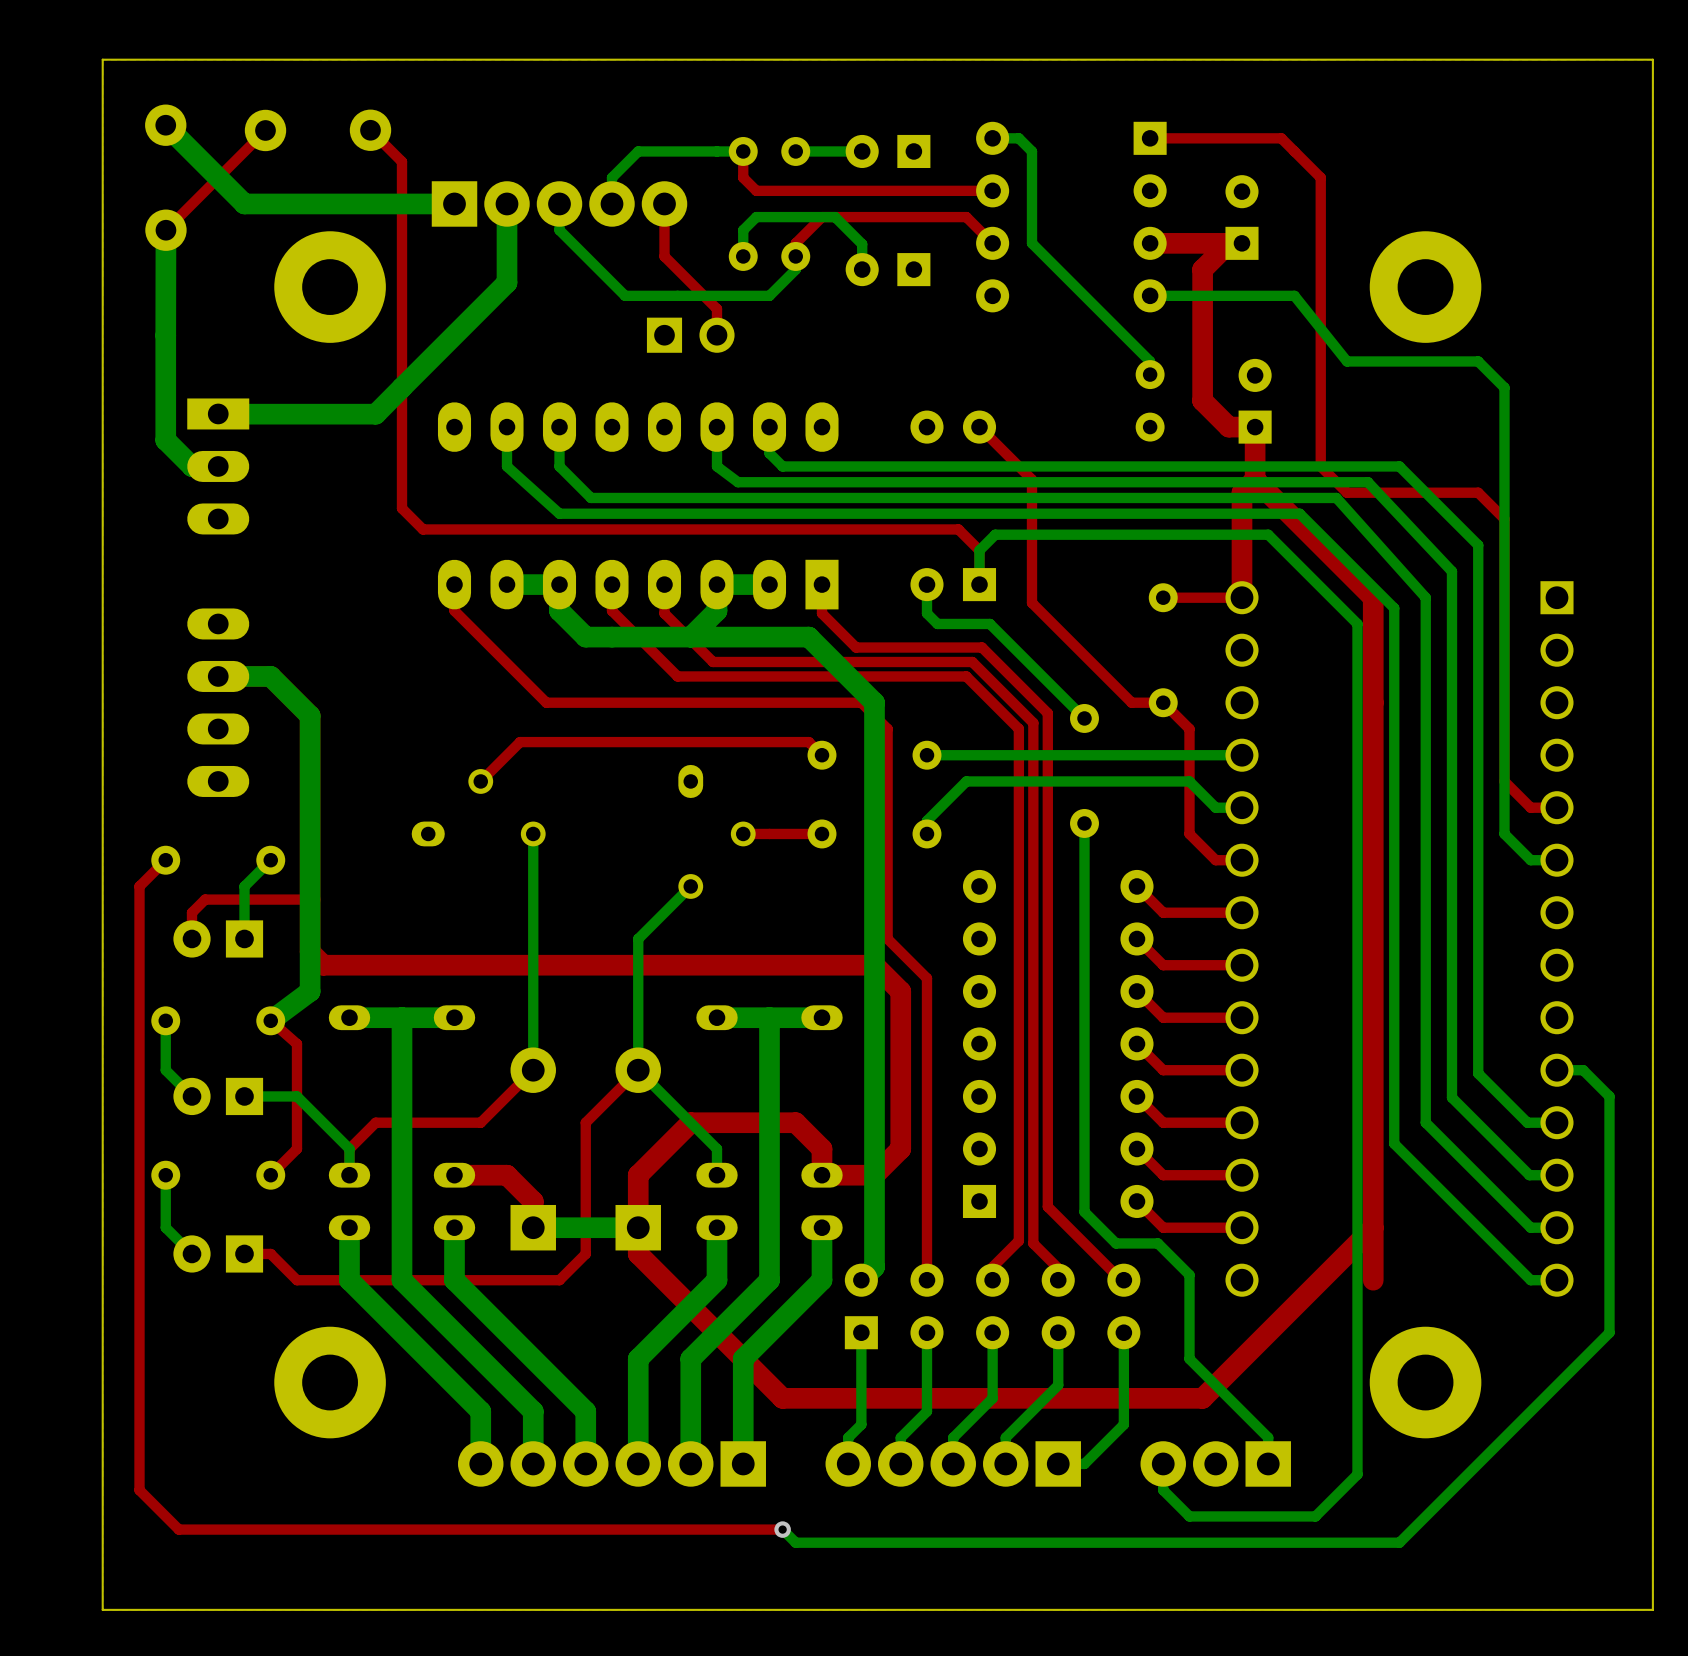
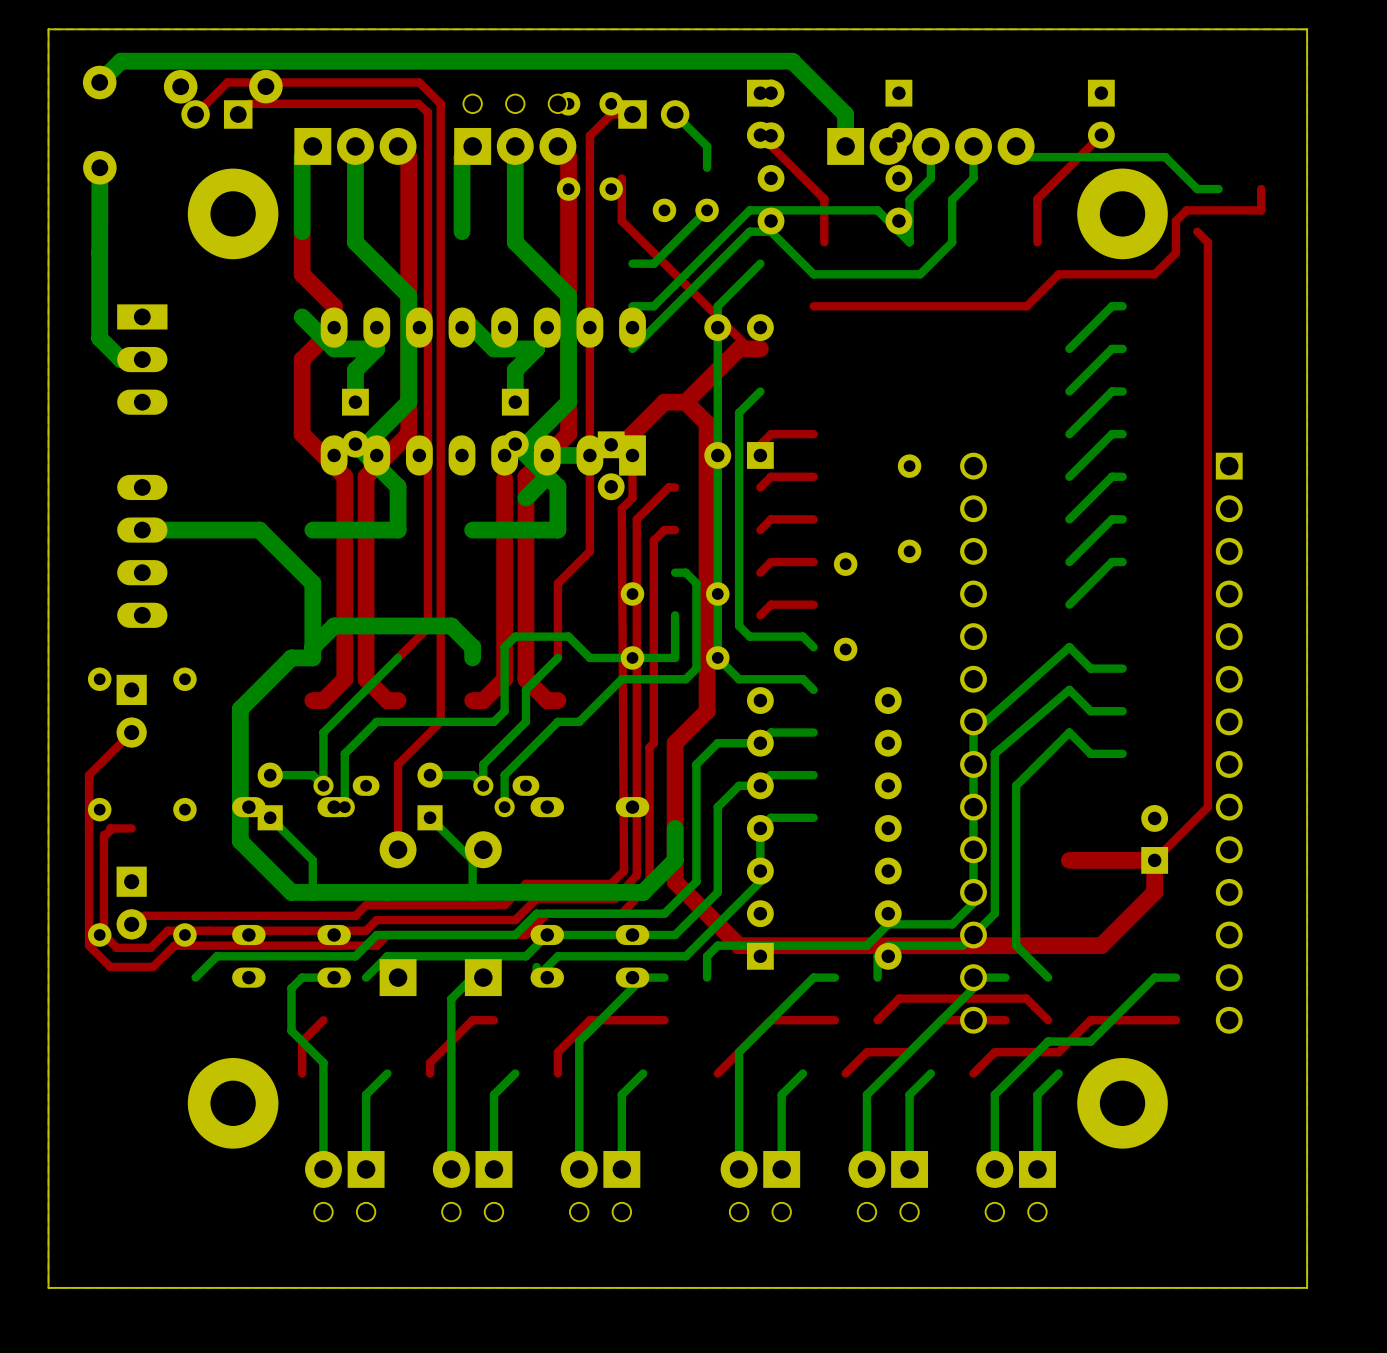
bottom track: (165, 125) (244, 203) (454, 203) -> (99, 82) (121, 61) (792, 61) (845, 114) (845, 146)
top track: (265, 130) (165, 230) -> none
top track: (370, 130) (402, 161) (402, 508) (423, 529) (958, 529) (979, 550) (979, 584) -> none
bottom track: (992, 138) (1018, 138) (1031, 151) (1031, 243) (1150, 361) (1150, 374) -> none
top track: (1150, 138) (1281, 138) (1320, 177) (1320, 268) -> (1101, 135) (1037, 199)
bottom track: (743, 151) (638, 151) (612, 177) (612, 203) -> none
top track: (743, 151) (743, 177) (756, 190) (992, 190) -> none
bottom track: (862, 151) (795, 151) -> none
part rotation: 0° (888, 151) -> 90° counterclockwise (760, 114)
part position: (888, 151) -> (760, 114)
top track: none -> (195, 114) (227, 82) (419, 82) (440, 103) (440, 721) (398, 764) (398, 860)
part: none -> (216, 114)
top track: none -> (238, 114) (248, 103) (418, 103) (427, 112) (427, 628) (398, 657)
top track: none -> (632, 114) (611, 114) (589, 135) (589, 551) (557, 583) (557, 657)
part: none -> (653, 114)
bottom track: none -> (675, 114) (707, 146) (707, 167)
part: none -> (1101, 114)
part: none -> (515, 129)
top track: none -> (760, 135) (824, 199) (824, 242)
bottom track: none -> (312, 146) (302, 157) (302, 231)
bottom track: none -> (355, 146) (355, 242) (408, 295) (408, 402) (366, 444) (355, 444) (398, 486) (398, 530) (312, 530)
part: none -> (355, 146)
bottom track: (507, 203) (507, 282) (375, 414) (218, 414) -> none
top track: none -> (398, 146) (408, 157) (408, 434) (366, 476) (366, 679) (387, 700) (398, 700)
bottom track: (559, 203) (559, 230) (625, 295) (769, 295) (795, 269) (795, 256) -> none
part: (559, 203) -> none
bottom track: none -> (472, 146) (462, 157) (462, 231)
top track: (664, 203) (664, 256) (717, 308) (717, 335) -> none
bottom track: none -> (515, 146) (515, 242) (568, 295) (568, 402) (526, 444) (515, 444) (557, 486) (557, 530) (472, 530)
top track: none -> (557, 146) (568, 157) (568, 434) (525, 476) (525, 679) (547, 700) (557, 700)
bottom track: none -> (930, 146) (930, 178) (909, 199) (909, 242) (877, 210) (749, 210) (653, 306) (632, 306)
part: none -> (930, 146)
bottom track: none -> (973, 146) (973, 178) (952, 199) (952, 242) (920, 274) (813, 274) (771, 231) (749, 231) (632, 348)
bottom track: none -> (1016, 146) (1026, 157) (1165, 157) (1197, 189) (1218, 189)
part: (1241, 217) -> none
top track: none -> (621, 178) (621, 221) (749, 348) (760, 348) (739, 348) (685, 402)
top track: (992, 243) (966, 217) (822, 217) (795, 243) (795, 256) -> none
top track: (1228, 243) (1202, 269) (1202, 400) (1228, 427) (1255, 427) (1255, 479) -> none
top track: (1241, 243) (1150, 243) -> none
part footprint: [845, 253, 931, 287] -> [652, 198, 719, 223]
bottom track: (743, 256) (743, 230) (756, 217) (835, 217) (862, 244) (862, 269) -> none
top track: none -> (1261, 189) (1261, 210) (1186, 210) (1175, 221) (1175, 253) (1154, 274) (1058, 274) (1026, 306) (813, 306)
bottom track: none -> (707, 210) (653, 263) (632, 263)
bottom track: (1150, 295) (1294, 295) (1346, 361) (1478, 361) (1504, 387) (1504, 833) (1530, 860) (1556, 860) -> none
top track: none -> (302, 231) (302, 274) (334, 306) (334, 327) (302, 359) (302, 434) (344, 476) (344, 679) (323, 700) (312, 700)
top track: none -> (1197, 231) (1207, 242) (1207, 807) (1154, 860)
top track: (1320, 322) (1320, 466) (1346, 492) (1478, 492) (1504, 518) (1504, 781) (1530, 807) (1556, 807) -> none
part: (690, 335) -> none
bottom track: none -> (760, 263) (717, 306) (717, 455)
part: (1150, 400) -> none
bottom track: none -> (1122, 306) (1112, 306) (1069, 348)
part: (1255, 401) -> none
bottom track: none -> (302, 316) (334, 348) (376, 348) (355, 370) (355, 402)
bottom track: none -> (462, 316) (493, 348) (536, 348) (515, 370) (515, 402)
bottom track: (559, 427) (559, 466) (591, 497) (1336, 497) (1425, 597) (1425, 1122) (1530, 1227) (1556, 1227) -> none
bottom track: (769, 427) (769, 453) (782, 466) (1399, 466) (1478, 545) (1478, 1073) (1527, 1122) (1556, 1122) -> none
top track: (979, 427) (1031, 479) (1031, 602) (1131, 702) (1163, 702) (1189, 728) (1189, 833) (1215, 860) (1241, 860) -> none
bottom track: (507, 440) (507, 466) (559, 513) (1299, 513) (1394, 608) (1394, 1143) (1530, 1280) (1556, 1280) -> none
bottom track: (717, 440) (717, 466) (738, 482) (1367, 482) (1451, 571) (1451, 1097) (1529, 1175) (1556, 1175) -> none
bottom track: none -> (1122, 348) (1112, 348) (1069, 391)
top track: (1255, 479) (1241, 492) (1241, 597) (1163, 597) -> none
top track: (1255, 479) (1373, 597) (1373, 1280) -> none
bottom track: none -> (760, 391) (739, 412) (739, 625) (749, 636) (803, 636) (813, 647)
bottom track: none -> (1122, 391) (1112, 391) (1069, 434)
top track: none -> (685, 402) (664, 402) (621, 444) (611, 444)
top track: none -> (685, 402) (707, 423) (707, 711) (675, 743) (675, 881) (739, 945) (1101, 945) (1154, 892) (1154, 860)
part: none -> (355, 423)
part: none -> (515, 423)
top track: none -> (813, 434) (771, 434) (760, 444)
bottom track: none -> (1122, 434) (1112, 434) (1069, 476)
top track: (454, 584) (454, 610) (546, 702) (861, 702) (887, 728) (887, 938) (927, 978) (927, 1280) -> none
bottom track: (507, 584) (559, 584) (559, 610) (585, 637) (808, 637) (874, 702) (874, 781) -> none
top track: (612, 584) (612, 610) (677, 676) (861, 676) -> (131, 732) (89, 775) (89, 945) (110, 966) (152, 966) (174, 945) (376, 945) (387, 934) (525, 934) (547, 913) (621, 913) (649, 883) (649, 747) (653, 743) (653, 540) (664, 530)
bottom track: (979, 584) (979, 550) (995, 534) (1268, 534) (1357, 623) (1357, 1474) (1315, 1516) (1189, 1516) (1163, 1490) (1163, 1463) -> (930, 1073) (909, 1094) (909, 1169)
part: none -> (611, 465)
top track: none -> (813, 476) (771, 476) (760, 487)
bottom track: none -> (1122, 476) (1112, 476) (1069, 519)
top track: (664, 613) (713, 662) (972, 662) (1033, 722) (1033, 1243) (1058, 1268) (1058, 1280) -> (504, 478) (504, 679) (483, 700) (472, 700)
top track: (822, 613) (856, 647) (982, 647) (1047, 713) (1047, 1206) (1121, 1280) (1123, 1280) -> (1048, 1020) (1026, 998) (899, 998) (877, 1020)
top track: none -> (632, 478) (632, 498) (621, 508) (623, 871) (611, 883) (525, 883) (504, 905) (366, 905) (355, 915) (144, 915) (135, 924) (131, 924)
bottom track: (927, 613) (937, 623) (989, 623) (1084, 718) -> (717, 478) (717, 647)
top track: none -> (675, 487) (668, 487) (636, 519) (636, 875) (615, 898) (536, 898) (515, 920) (376, 920) (366, 930) (167, 930) (150, 947) (116, 947) (103, 934) (103, 834)
top track: none -> (813, 519) (771, 519) (760, 530)
bottom track: none -> (1122, 519) (1112, 519) (1069, 562)
top track: (218, 676) (270, 676) (310, 715) (310, 952) (323, 965) (874, 965) (900, 991) (900, 1148) (874, 1175) (822, 1175) (822, 1148) (795, 1122) (690, 1122) (638, 1175) (638, 1253) (782, 1398) (1202, 1398) (1373, 1227) -> none
bottom track: (270, 676) (310, 715) (310, 991) (270, 1020) -> (184, 530) (259, 530) (312, 583) (312, 657) (291, 657) (240, 709) (240, 841) (291, 892) (643, 892) (675, 860)
top track: (874, 676) (966, 676) (1018, 728) (1018, 1240) (992, 1267) (992, 1280) -> none
top track: none -> (813, 562) (771, 562) (760, 572)
bottom track: none -> (1122, 562) (1112, 562) (1069, 604)
bottom track: none -> (675, 572) (685, 572) (696, 583) (696, 668) (685, 679) (621, 679) (579, 721) (557, 721) (504, 775) (504, 807)
top track: (822, 755) (808, 742) (520, 742) (480, 781) -> none
bottom track: (1241, 755) (927, 755) -> none
top track: none -> (813, 604) (771, 604) (760, 615)
bottom track width: thick (874, 781) (874, 833) -> thin (675, 615) (675, 657)
part: (478, 807) -> none
bottom track: (1241, 807) (1215, 807) (1189, 781) (966, 781) (927, 820) -> none
bottom track: none -> (312, 647) (334, 625) (451, 625) (472, 647) (472, 657)
bottom track: (1084, 823) (1084, 1211) (1115, 1243) (1157, 1243) (1189, 1274) (1189, 1358) (1268, 1437) -> (1175, 977) (1154, 977) (1090, 1041) (1048, 1041) (994, 1094) (994, 1148)
part: (717, 831) -> none
bottom track: (533, 833) (533, 1070) -> (398, 657) (323, 732) (323, 785) (312, 775) (270, 775)
top track: (822, 833) (743, 833) -> none
bottom track: (874, 833) (874, 1043) -> (675, 657) (589, 657) (568, 636) (515, 636) (504, 647) (504, 711) (493, 721) (376, 721) (344, 753) (344, 807)
bottom track: none -> (717, 657) (739, 679) (803, 679) (813, 689)
bottom track: none -> (1122, 668) (1090, 668) (1069, 647) (973, 732) (973, 903) (952, 924) (888, 924) (866, 945) (717, 945) (707, 956) (707, 977)
top track: (165, 860) (139, 886) (139, 1490) (178, 1529) (782, 1529) -> none
bottom track: (270, 860) (244, 886) (244, 938) -> none
bottom track: (690, 886) (638, 938) (638, 965) -> (557, 657) (525, 689) (525, 721) (483, 764)
top track: (1136, 886) (1163, 912) (1241, 912) -> none
top track: (310, 899) (205, 899) (192, 912) (192, 938) -> none
bottom track: none -> (1122, 711) (1090, 711) (1069, 689) (994, 753) (994, 913) (962, 945) (888, 945) (877, 956) (877, 977)
bottom track: none -> (813, 732) (771, 732) (760, 743) (717, 743) (696, 764) (696, 881) (664, 913) (536, 913) (515, 934) (376, 934) (355, 956) (216, 956) (195, 977)
part rotation: 0° (218, 938) -> 90° counterclockwise (131, 711)
top track: (1136, 938) (1163, 965) (1241, 965) -> none
bottom track: none -> (1122, 753) (1090, 753) (1069, 732) (1016, 785) (1016, 945) (1048, 977)
bottom track: none -> (813, 775) (771, 775) (760, 785) (739, 785) (717, 807) (717, 892) (675, 934) (547, 934) (525, 956) (387, 956) (366, 977)
bottom track: (638, 991) (638, 1070) (717, 1148) (717, 1175) -> (483, 785) (472, 775) (430, 775)
top track: (1136, 991) (1163, 1017) (1241, 1017) -> none
part: none -> (270, 796)
part: none -> (346, 796)
part: none -> (430, 796)
part: none -> (506, 796)
bottom track: (402, 1017) (402, 1240) -> (323, 977) (302, 977) (291, 988)
bottom track: (454, 1017) (349, 1017) -> none
bottom track: (769, 1017) (769, 1280) (690, 1358) (690, 1463) -> none
bottom track: (822, 1017) (717, 1017) -> none
bottom track: (165, 1020) (165, 1070) (192, 1096) -> none
top track: (270, 1020) (297, 1043) (297, 1148) (270, 1175) -> none
bottom track: none -> (270, 817) (312, 860) (312, 892)
bottom track: none -> (430, 817) (472, 860) (472, 892)
bottom track: none -> (813, 817) (771, 817) (760, 828) (760, 881) (685, 956) (557, 956) (536, 977) (536, 966)
top track: none -> (131, 828) (110, 828) (103, 836)
top track: (1136, 1043) (1163, 1070) (1241, 1070) -> none
part: none -> (1154, 839)
top track: (533, 1070) (480, 1122) (375, 1122) (349, 1148) (349, 1175) -> none
top track: (638, 1070) (585, 1122) (585, 1253) (559, 1280) (297, 1280) (270, 1253) (244, 1253) -> none
bottom track: (1556, 1070) (1583, 1070) (1609, 1096) (1609, 1332) (1399, 1542) (795, 1542) (782, 1529) -> none
bottom track: (874, 1083) (874, 1267) (861, 1280) -> none
top track: none -> (1154, 860) (1069, 860)
part rotation: 0° (218, 1096) -> 90° counterclockwise (131, 903)
bottom track: (244, 1096) (297, 1096) (349, 1148) (349, 1175) -> none
top track: (1136, 1096) (1163, 1122) (1241, 1122) -> none
top track: (1136, 1148) (1163, 1175) (1241, 1175) -> none
bottom track: (165, 1175) (165, 1227) (192, 1253) -> none
top track: (454, 1175) (507, 1175) (533, 1201) (533, 1227) -> none
top track: (1136, 1201) (1163, 1227) (1241, 1227) -> none
bottom track: (349, 1227) (349, 1280) (480, 1411) (480, 1463) -> none
bottom track: (454, 1227) (454, 1280) (585, 1411) (585, 1463) -> none
bottom track: (625, 1227) (533, 1227) -> (472, 977) (451, 998) (451, 1169)
bottom track: (717, 1227) (717, 1280) (638, 1358) (638, 1463) -> none
bottom track: (822, 1227) (822, 1280) (743, 1358) (743, 1463) -> none
bottom track: none -> (664, 977) (643, 977) (579, 1041) (579, 1169)
bottom track: none -> (1005, 977) (984, 977) (866, 1094) (866, 1169)
bottom track width: thick (402, 1240) (402, 1280) -> thin (291, 988) (291, 1020)
part: (218, 1253) -> none
bottom track: (402, 1280) (533, 1411) (533, 1463) -> (291, 1020) (291, 1030) (323, 1062) (323, 1169)
top track: none -> (323, 1020) (302, 1041) (302, 1073)
top track: none -> (493, 1020) (472, 1020) (430, 1062) (430, 1073)
top track: none -> (664, 1020) (589, 1020) (557, 1052) (557, 1073)
top track: none -> (834, 1020) (771, 1020) (717, 1073)
top track: none -> (1005, 1020) (941, 1020) (909, 1052) (866, 1052) (845, 1073)
top track: none -> (1175, 1020) (1090, 1020) (1058, 1052) (994, 1052) (973, 1073)
part: (861, 1306) -> none
part: (927, 1306) -> none
part: (992, 1306) -> none
part: (1058, 1306) -> none
part: (1123, 1306) -> none
bottom track: (861, 1332) (861, 1424) (848, 1437) (848, 1463) -> none
bottom track: (927, 1332) (927, 1411) (900, 1437) (900, 1463) -> none
bottom track: (992, 1332) (992, 1398) (953, 1437) -> (834, 977) (813, 977) (739, 1052) (739, 1148)
bottom track: (1058, 1332) (1058, 1385) (1005, 1437) -> (803, 1073) (781, 1094) (781, 1148)
bottom track: (1123, 1332) (1123, 1424) (1084, 1463) (1058, 1463) -> none
bottom track: none -> (387, 1073) (366, 1094) (366, 1169)
bottom track: none -> (515, 1073) (493, 1094) (493, 1169)
bottom track: none -> (643, 1073) (621, 1094) (621, 1169)
bottom track: none -> (1058, 1073) (1037, 1094) (1037, 1169)
part: (612, 1463) -> none
part: (953, 1463) -> none
part: (1215, 1463) -> none
part: none -> (344, 1186)
part: none -> (472, 1186)
part: none -> (600, 1186)
part: none -> (760, 1186)
part: none -> (888, 1186)
part: none -> (1016, 1186)
via: (782, 1529) -> none

